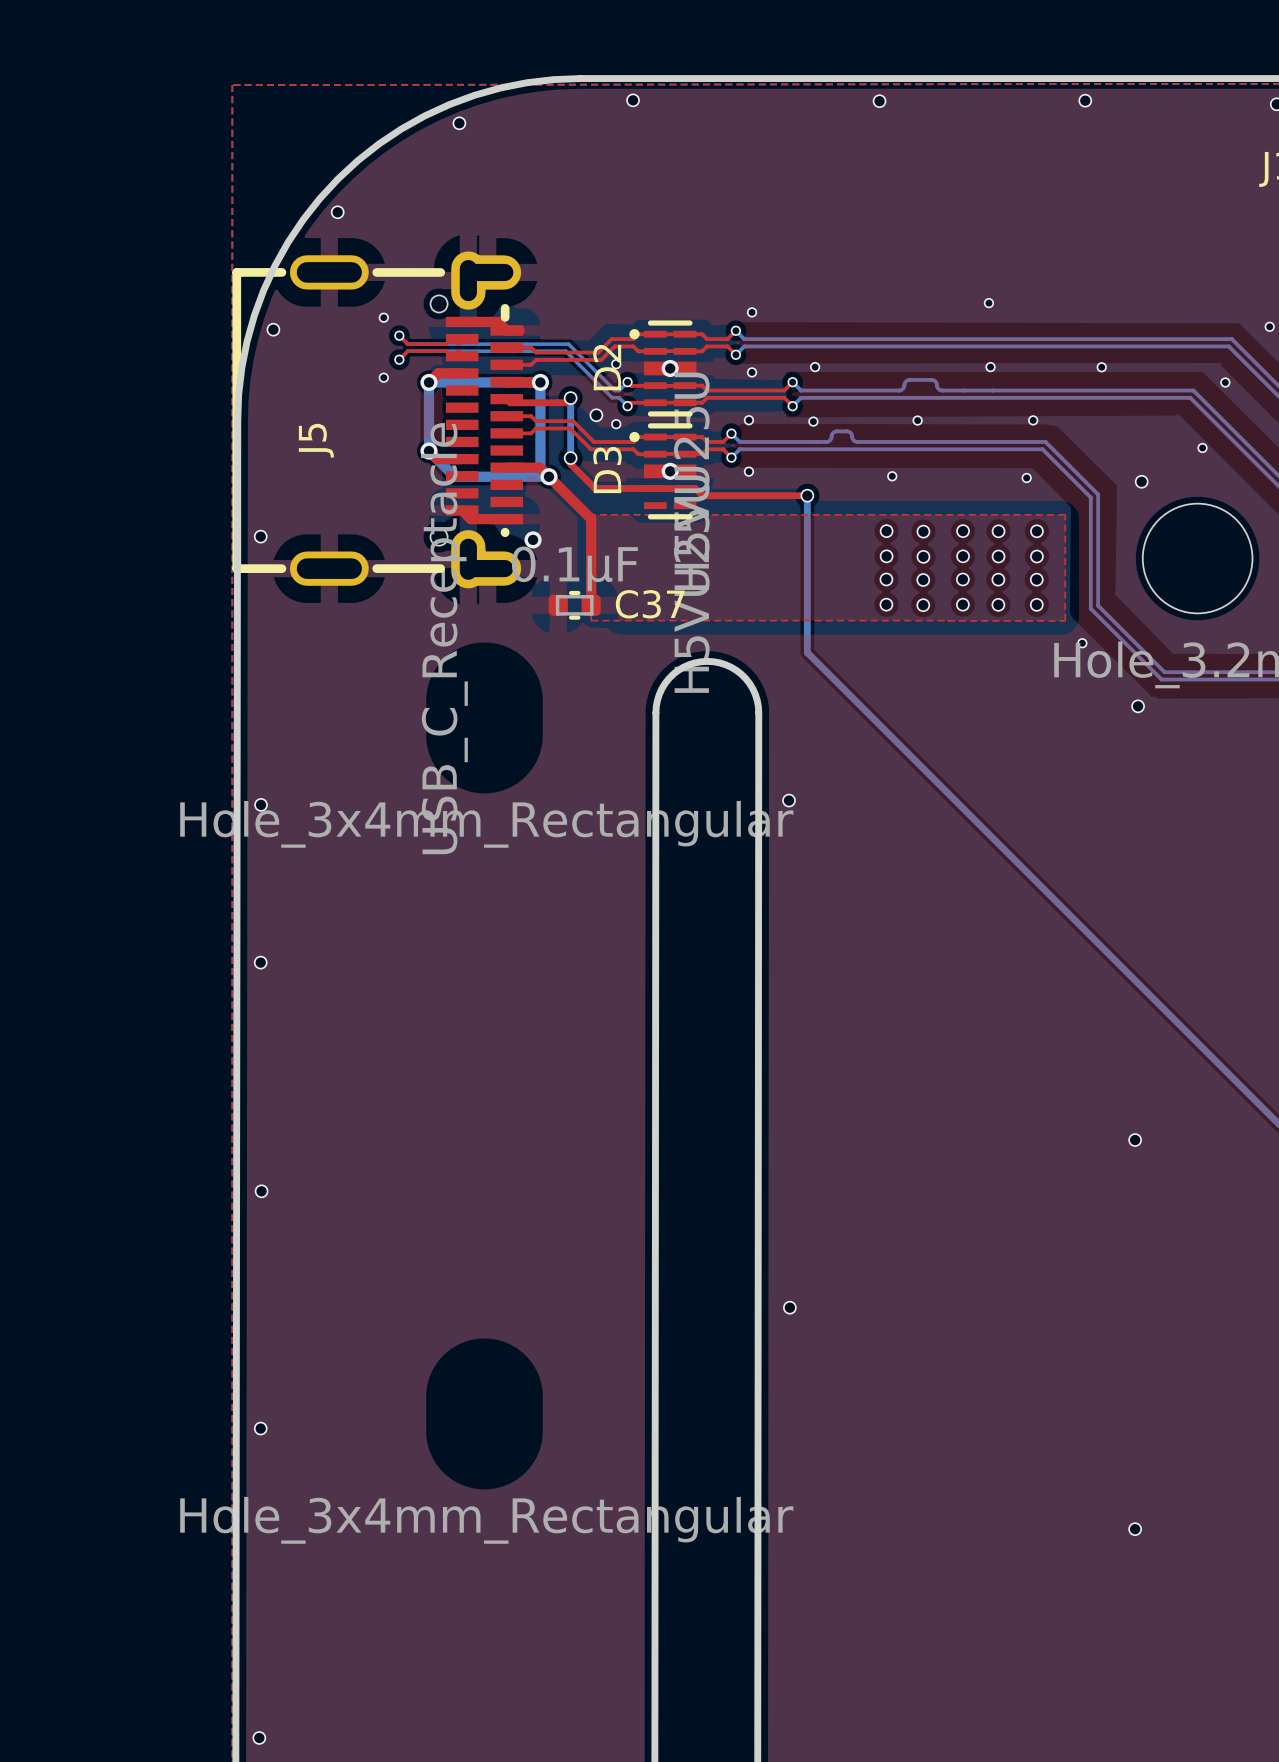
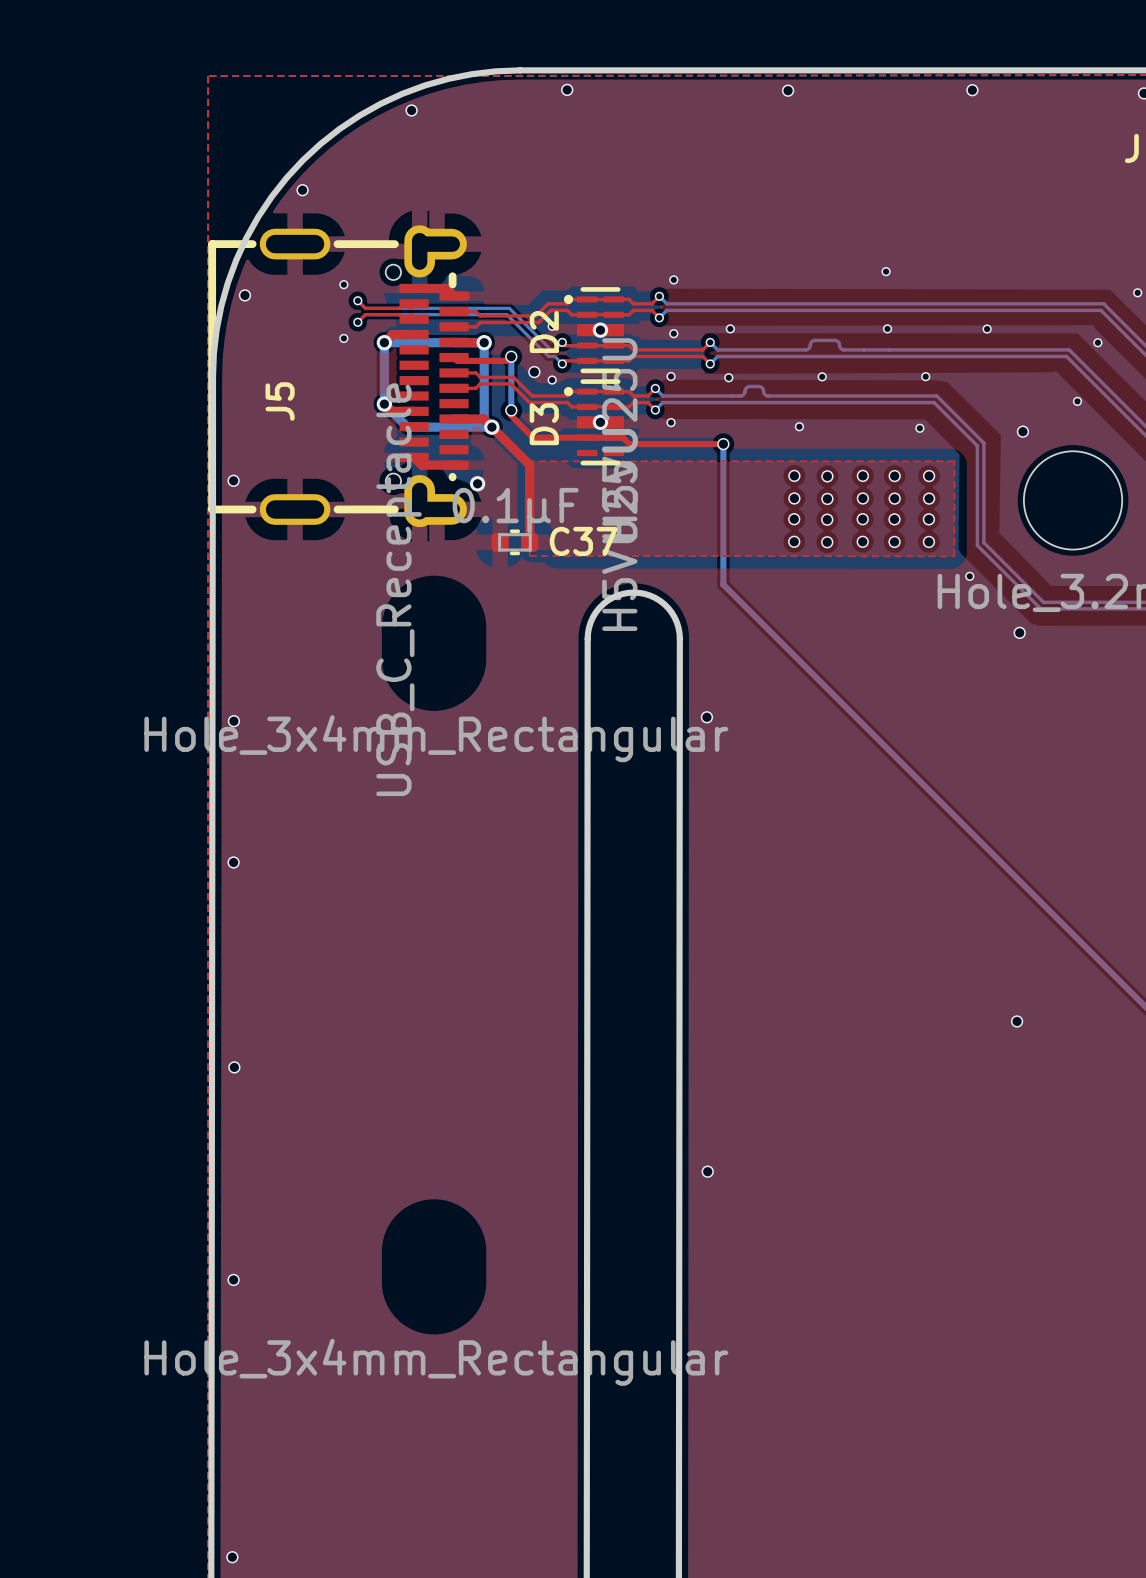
via: (1135, 1529) -> none

